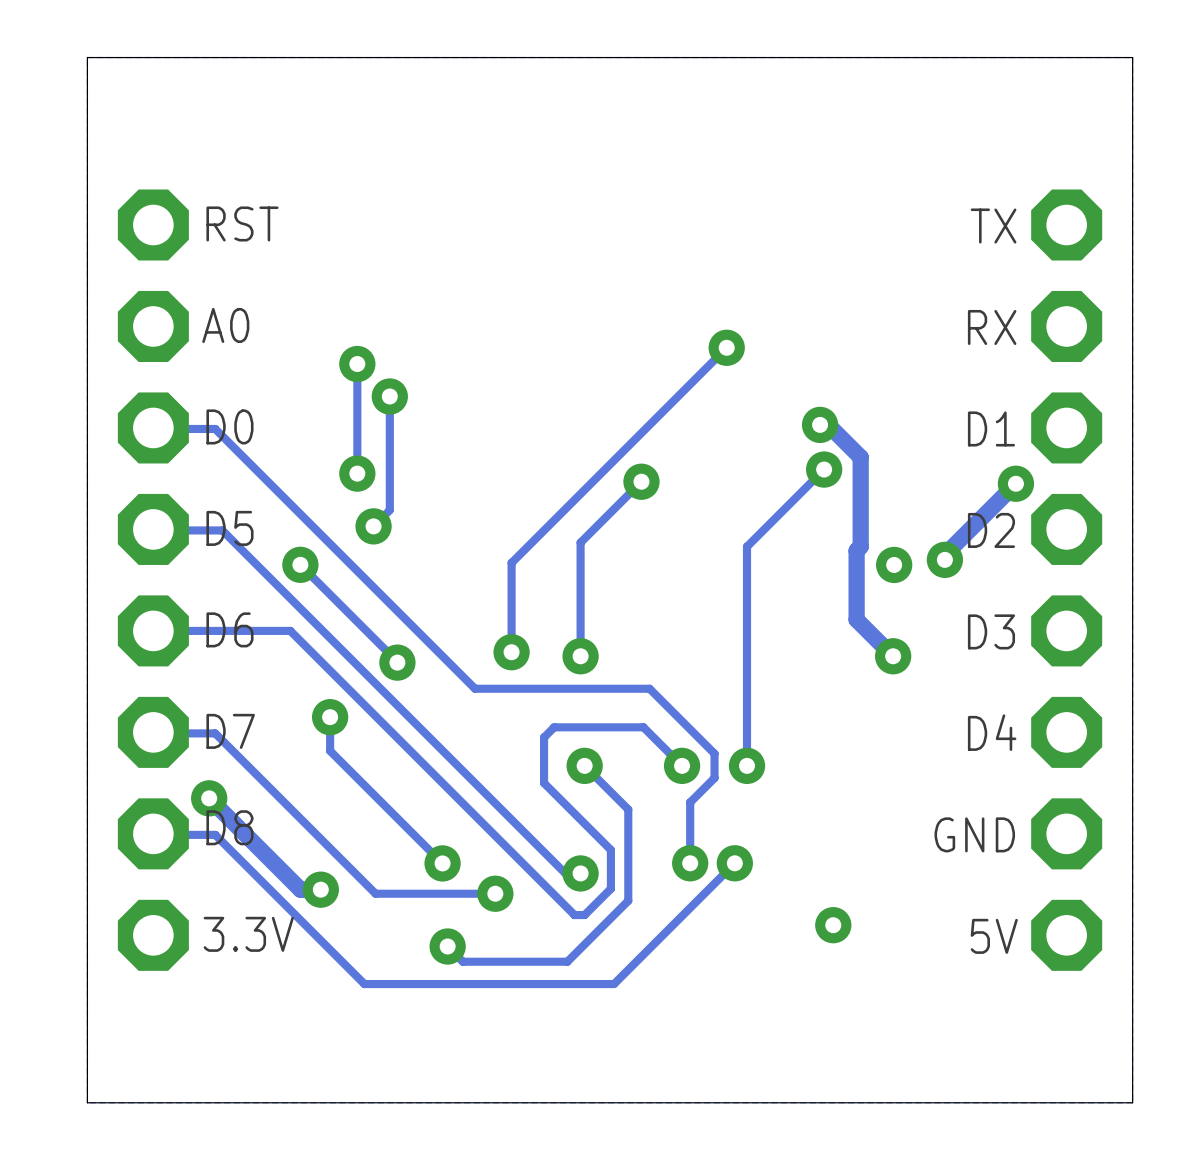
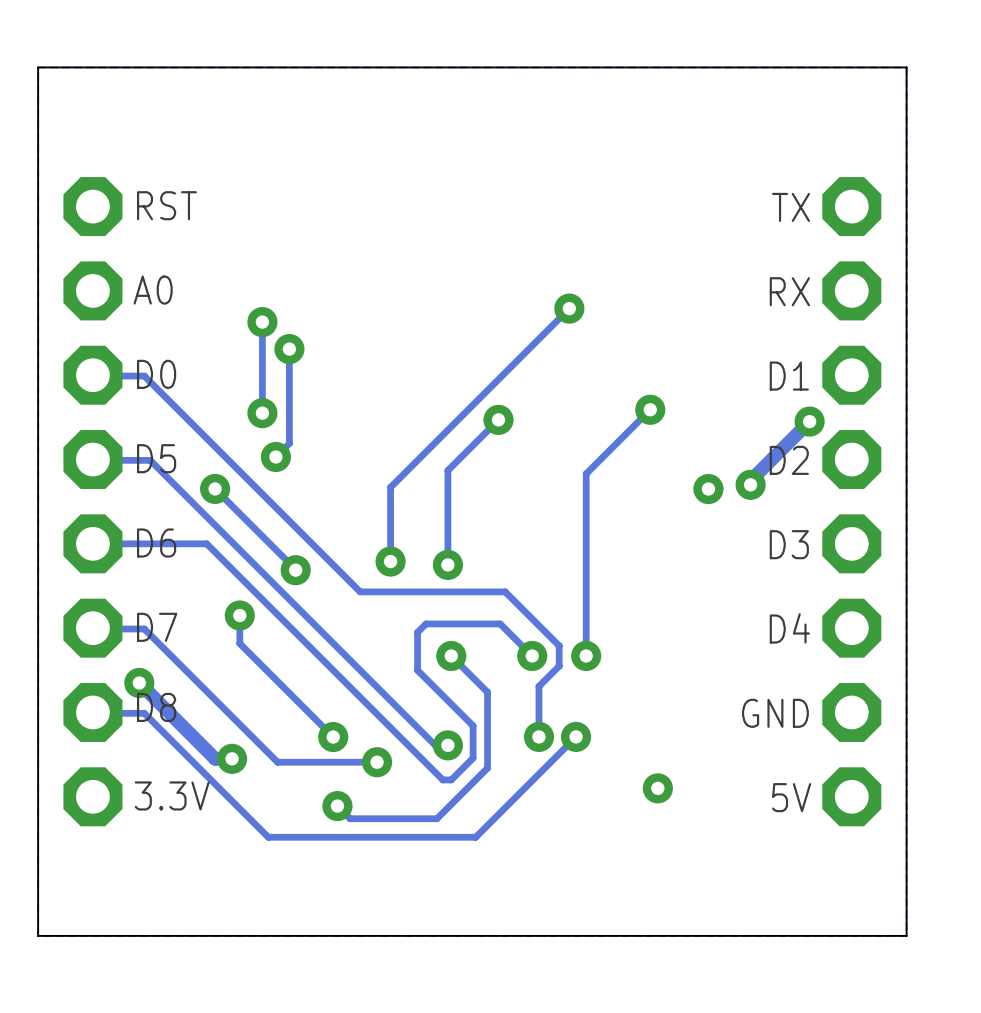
track: (820, 424) (828, 424) (860, 457) (860, 546) (856, 550) (856, 619) (893, 656) -> none
via: (820, 424) -> none
via: (893, 656) -> none

